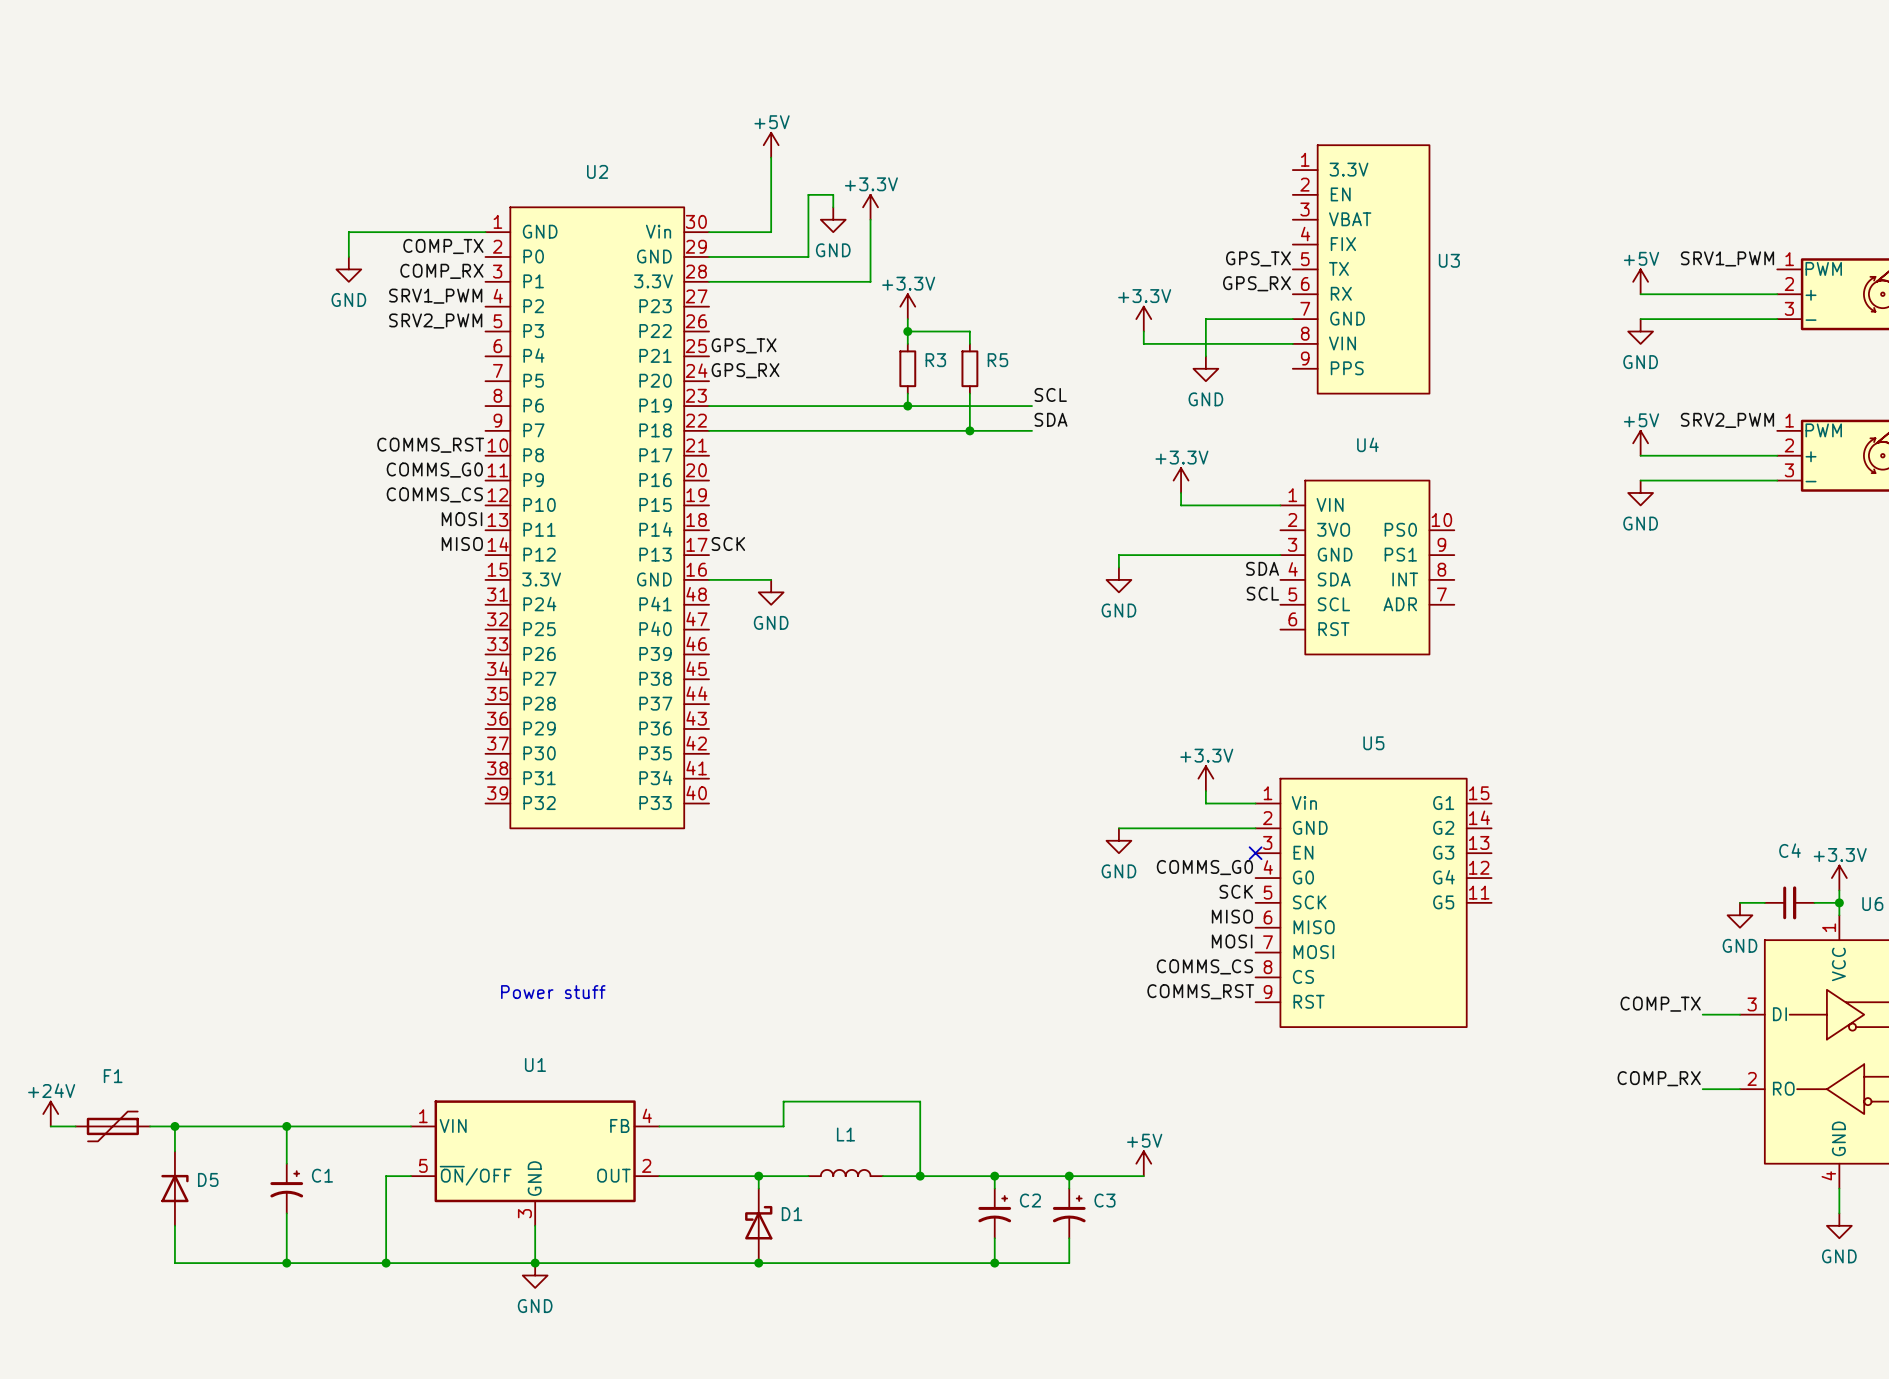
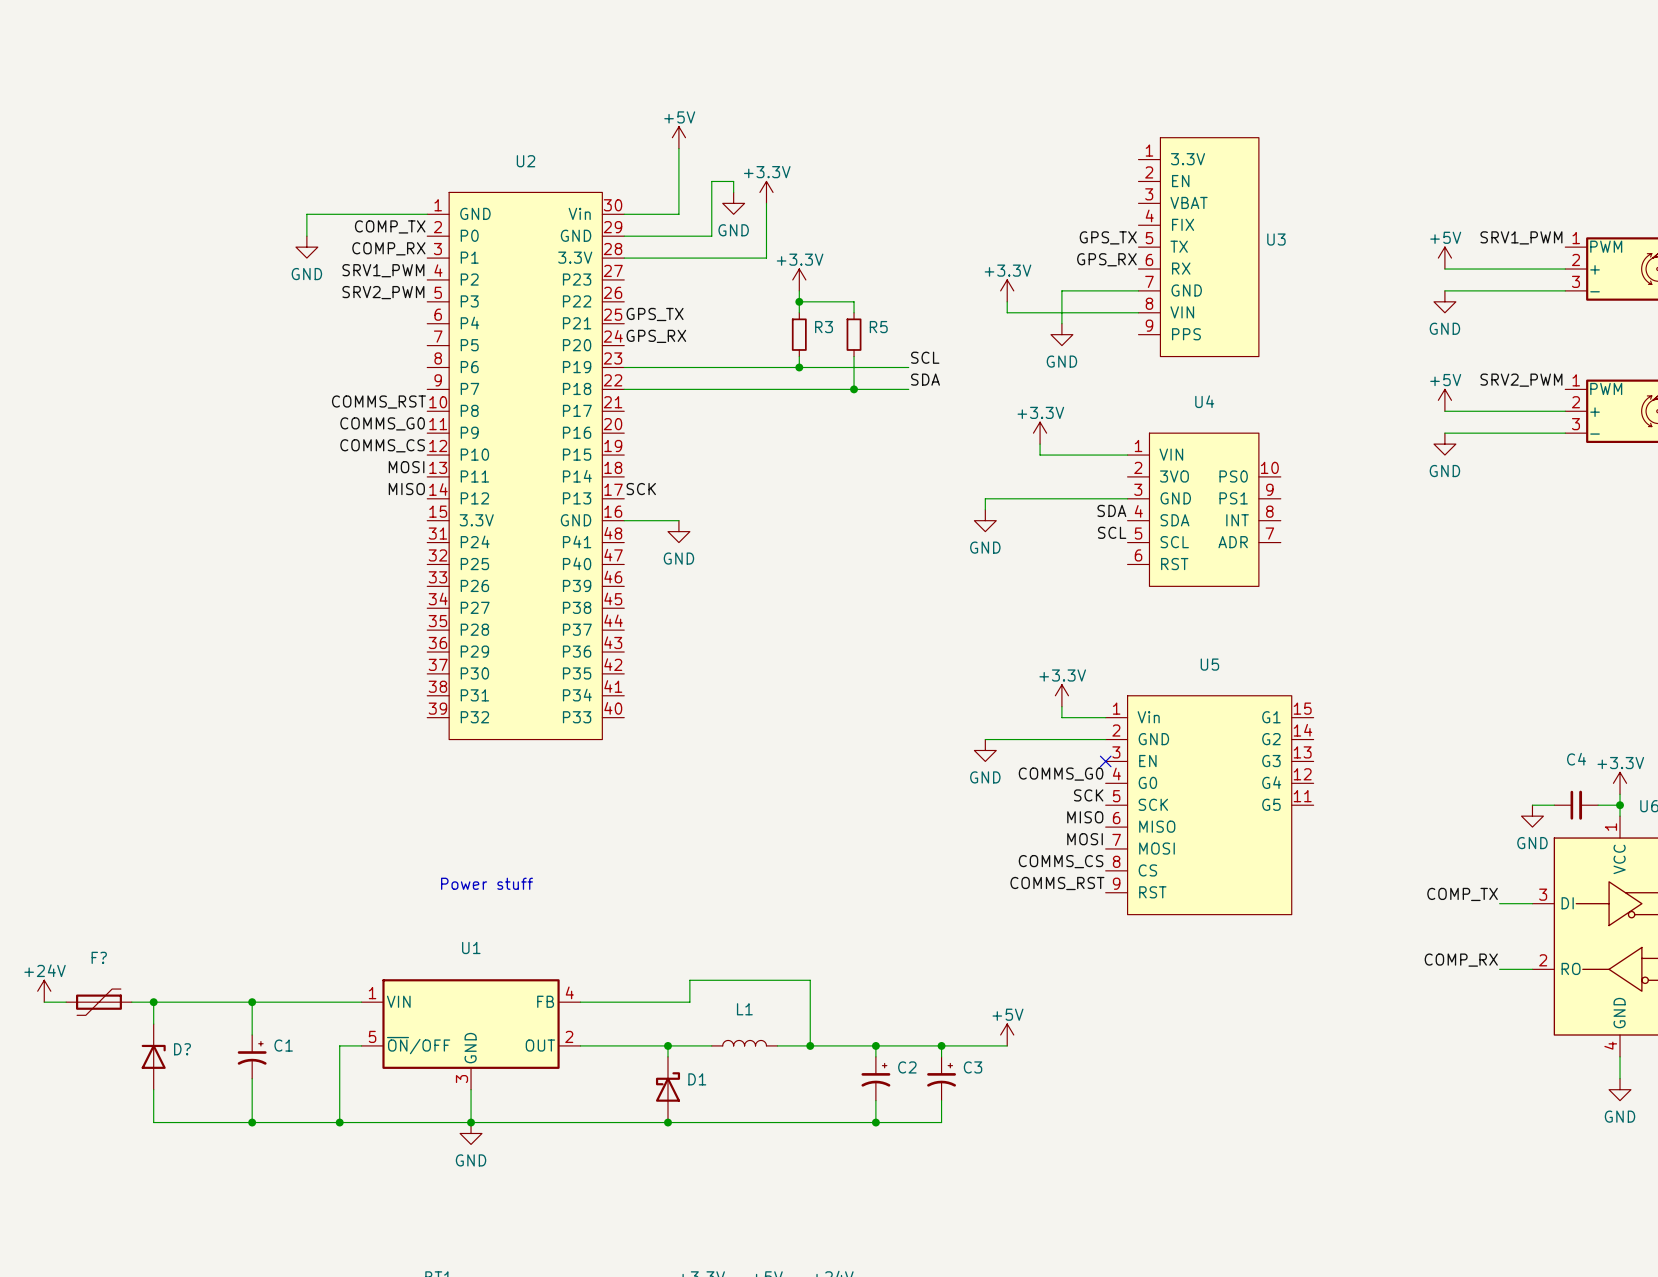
F1 name: F1 (113, 1076) -> F? (99, 957)
D5 name: D5 (208, 1179) -> D? (182, 1049)

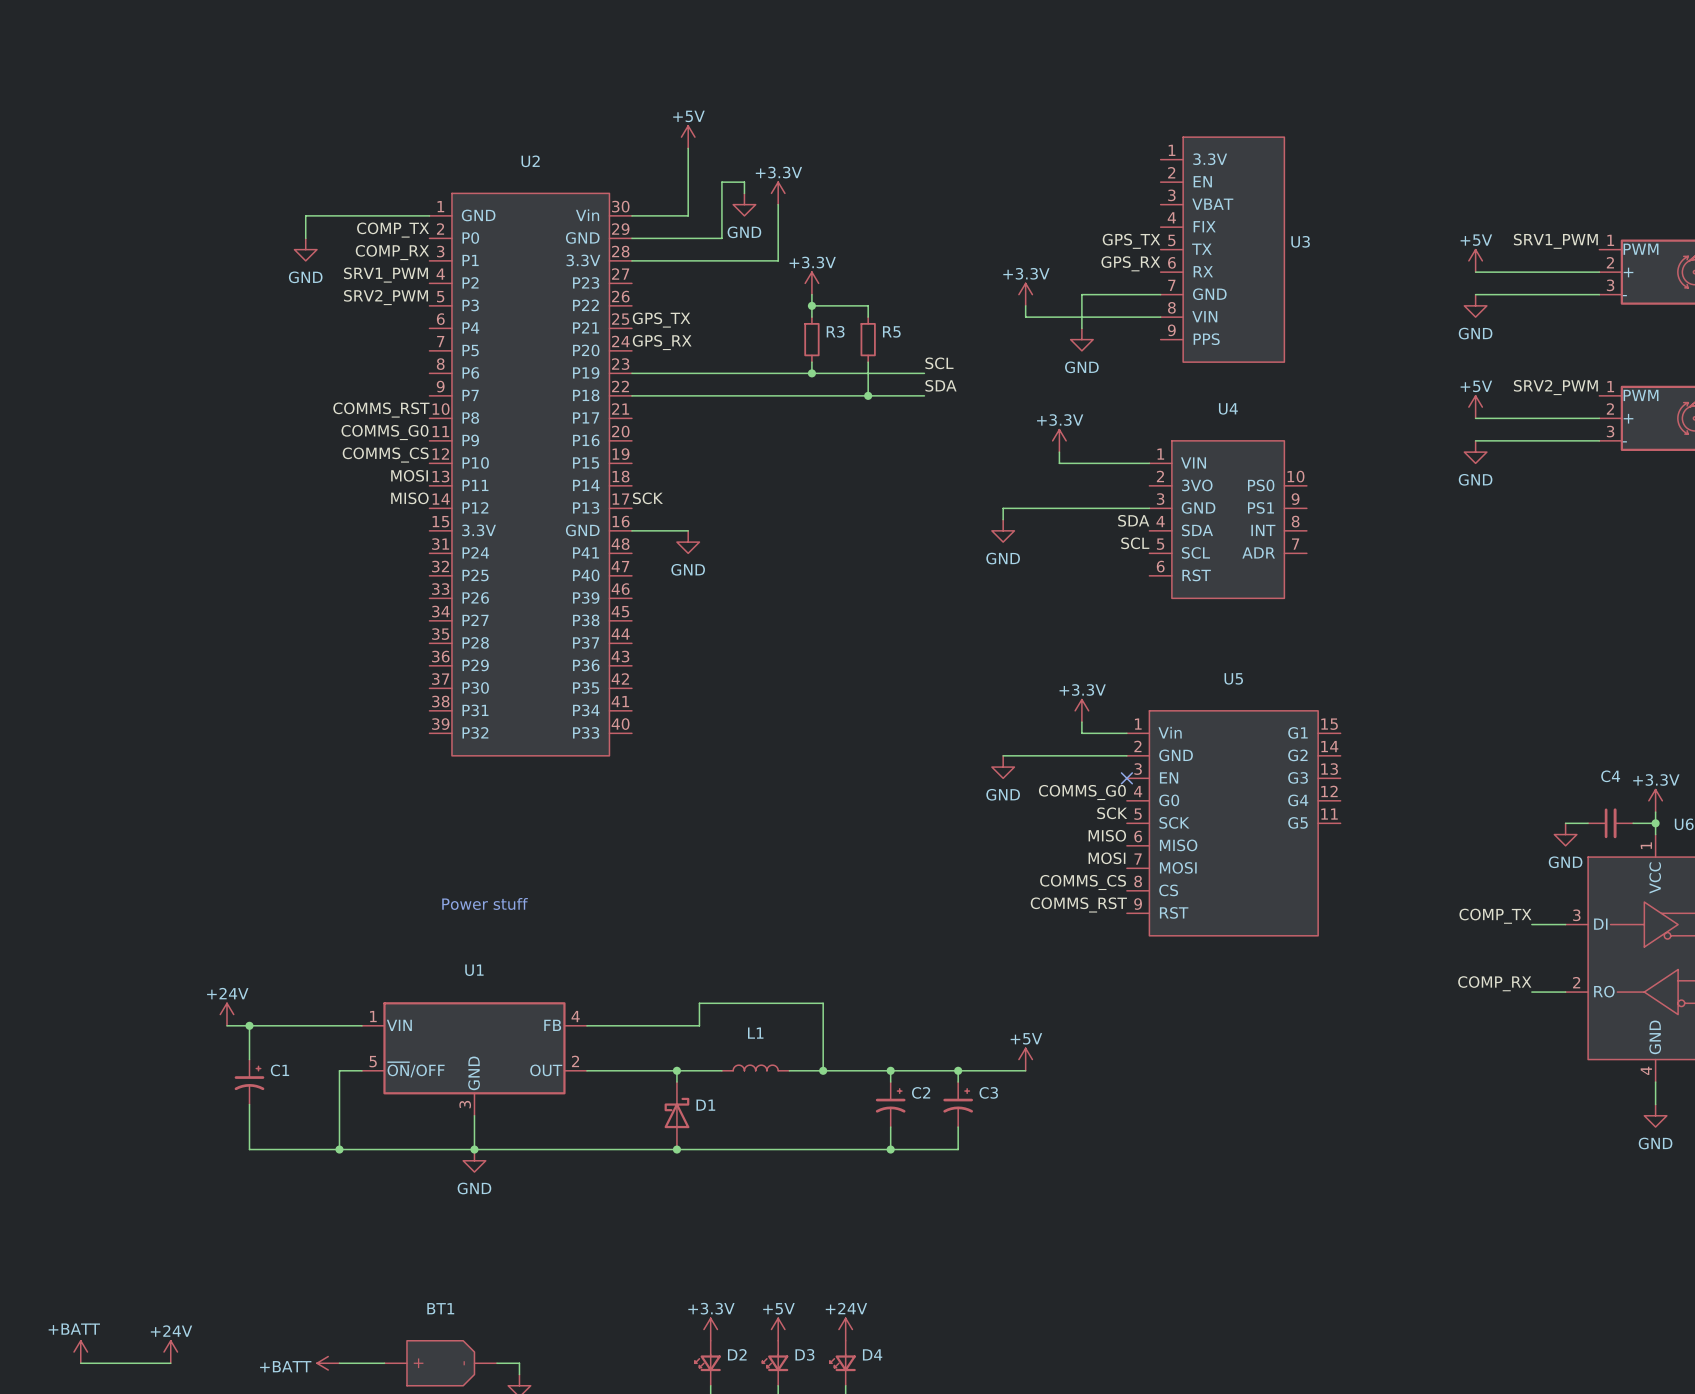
power symbol position: +24V (44, 991) -> +24V (226, 1014)
wire: (44, 1002) (66, 1002) -> none
F?: (98, 1002) -> none
wire: (131, 1002) (230, 1002) -> none
wire: (153, 1002) (153, 1024) -> none
junction: (153, 1002) -> none
D?: (153, 1056) -> none
wire: (153, 1089) (153, 1122) (252, 1122) -> none
junction: (252, 1122) -> none

